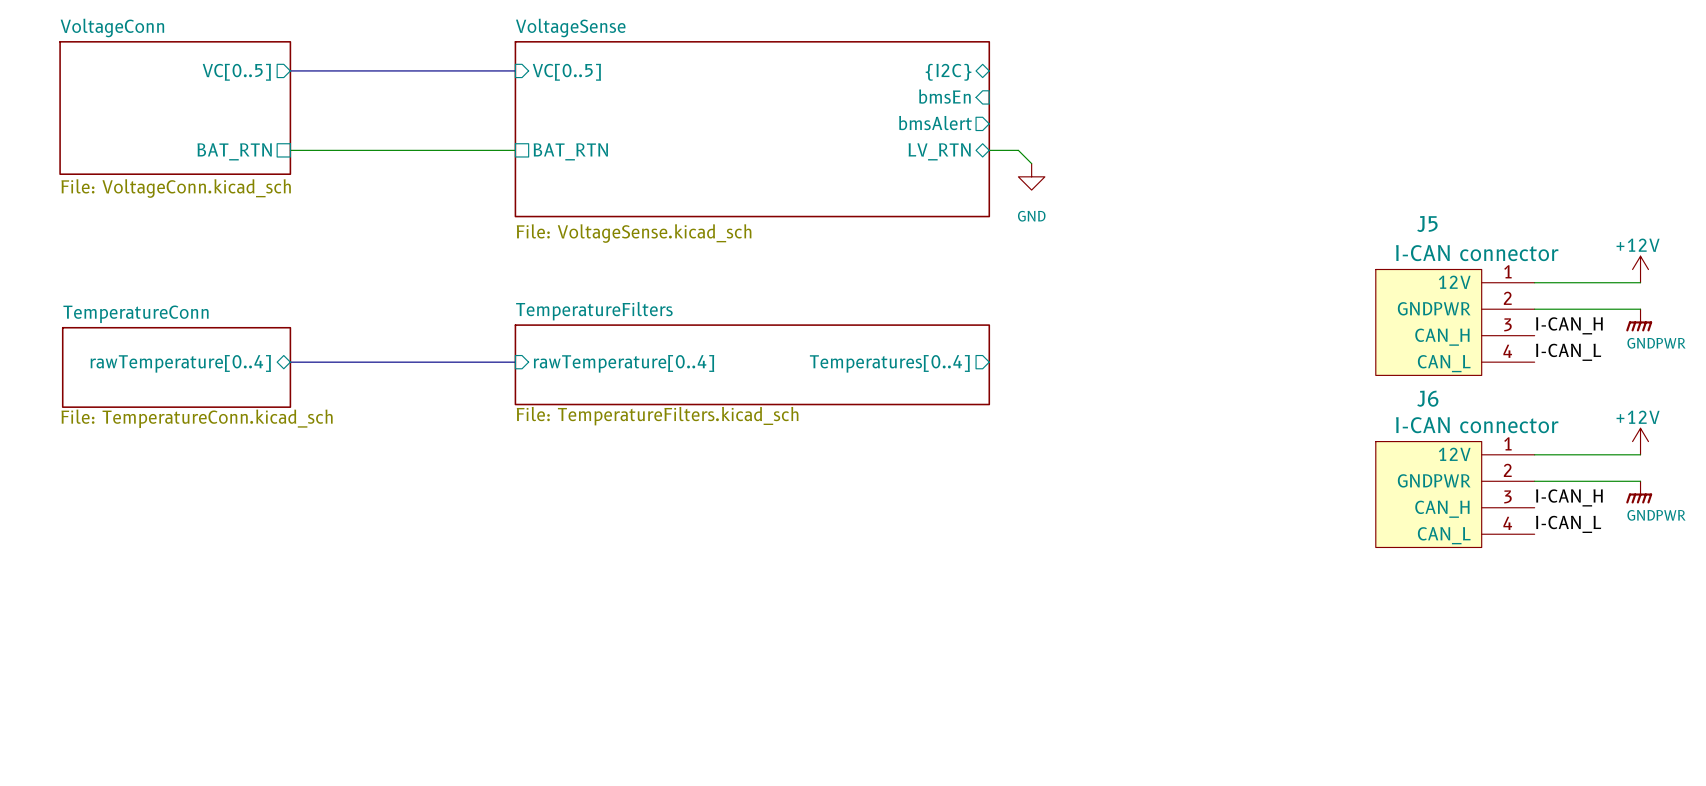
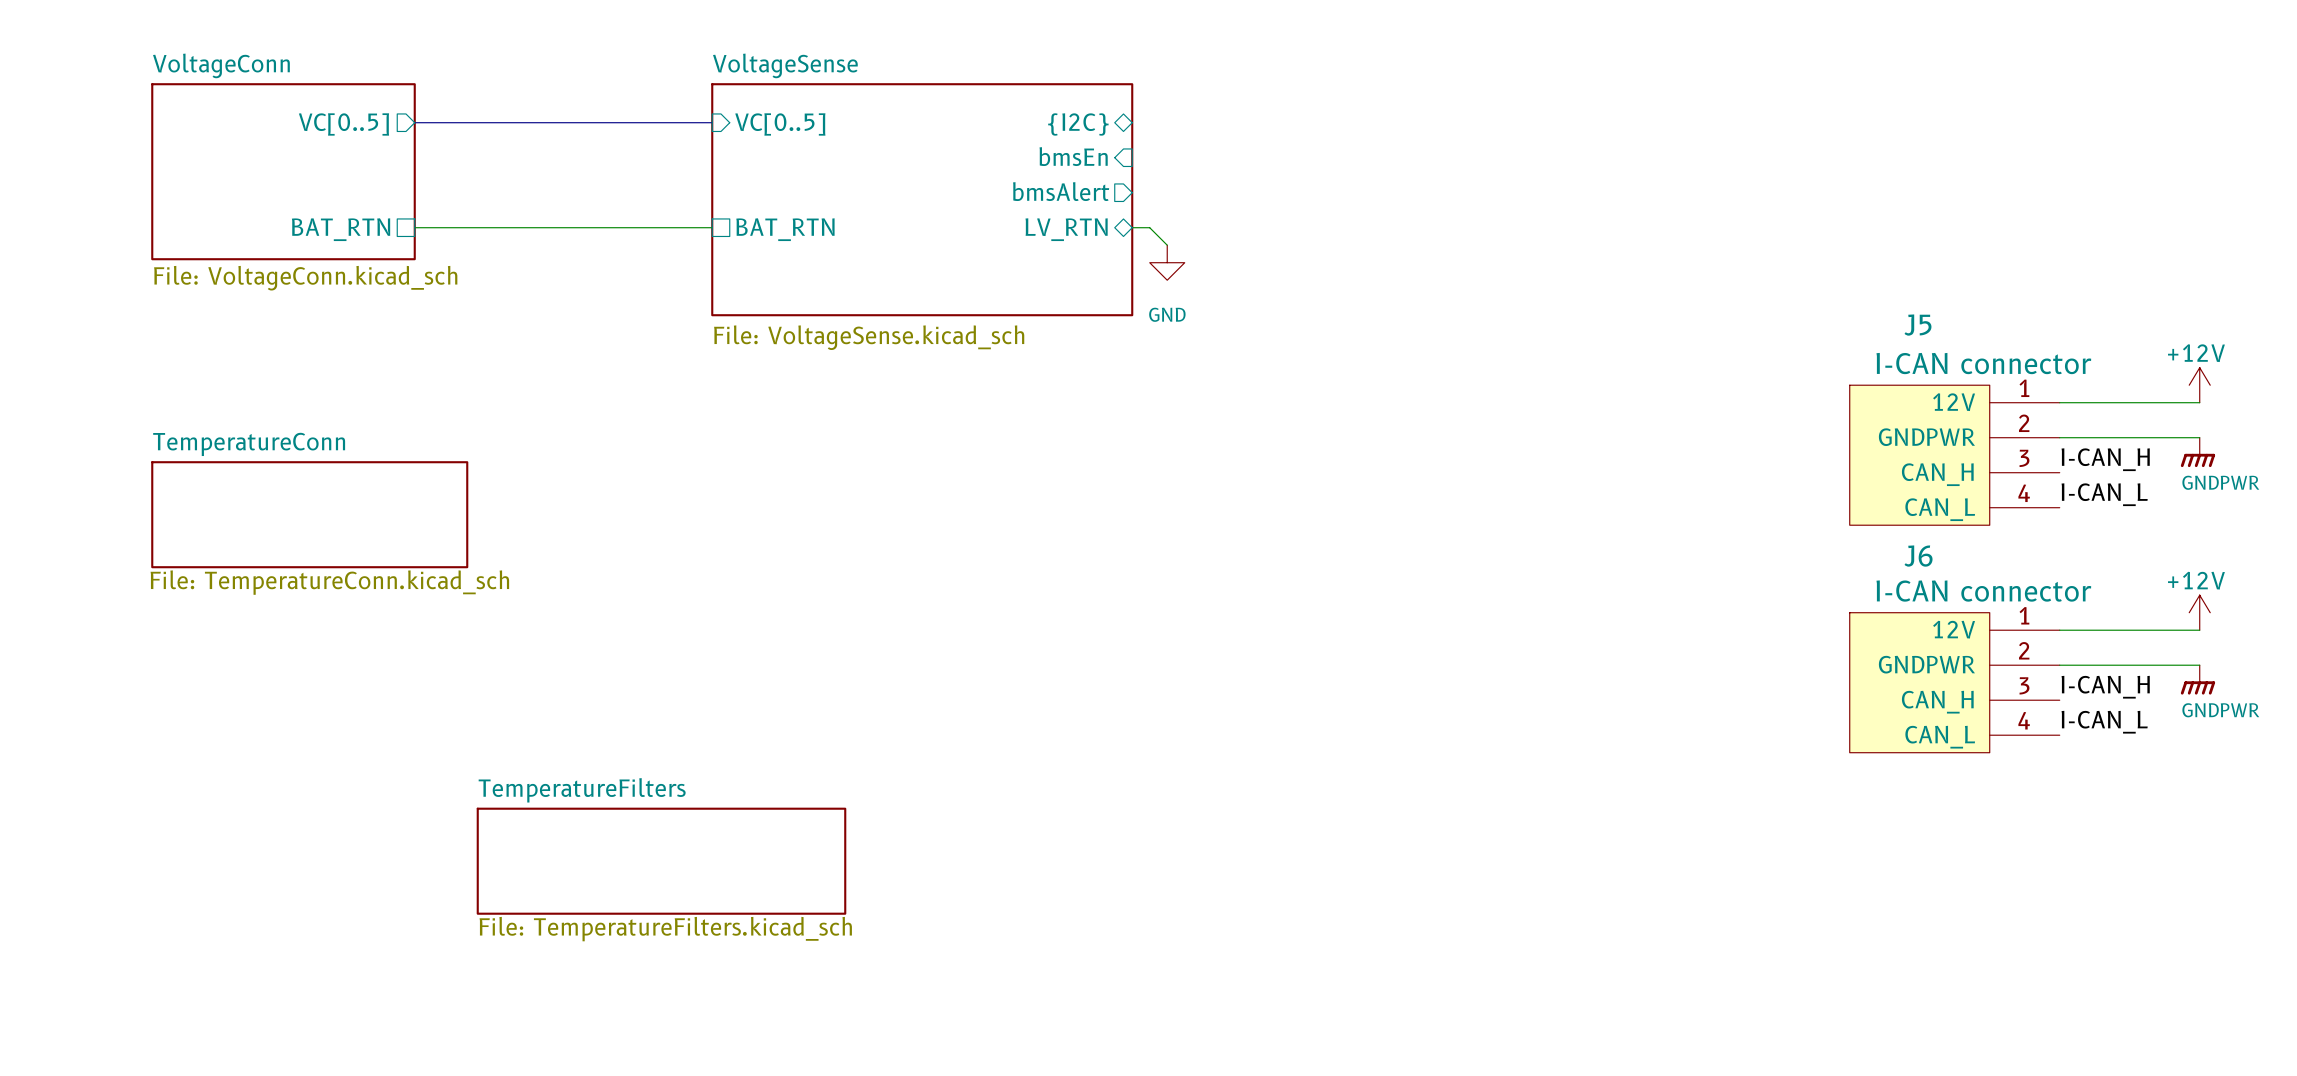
sheet pin position: {I2C} (948, 72) -> {I2C} (1078, 124)
sheet pin position: bmsEn (944, 96) -> bmsEn (1073, 156)
sheet VoltageConn: File: VoltageConn.kicad_sch (175, 108) -> none
sheet VoltageConn: none -> File: VoltageConn.kicad_sch (283, 171)
sheet pin position: bmsAlert (935, 123) -> bmsAlert (1061, 191)
sheet VoltageSense: none -> File: VoltageSense.kicad_sch (922, 199)
sheet VoltageSense: File: VoltageSense.kicad_sch (752, 129) -> none
wire: none -> (1132, 227) (1149, 227) (1167, 245)
wire: (989, 150) (1018, 150) (1031, 163) -> none
sheet pin position: LV_RTN (939, 151) -> LV_RTN (1066, 229)
power symbol position: GND (1031, 176) -> GND (1167, 262)
bus: (290, 362) (515, 362) -> none
sheet pin: rawTemperature[0..4] (180, 363) -> none
sheet pin: rawTemperature[0..4] (624, 363) -> none
sheet pin: Temperatures[0..4] (889, 363) -> none
sheet TemperatureFilters: File: TemperatureFilters.kicad_sch (752, 364) -> none
sheet TemperatureConn: File: TemperatureConn.kicad_sch (176, 367) -> none
sheet TemperatureConn: none -> File: TemperatureConn.kicad_sch (309, 514)
sheet TemperatureFilters: none -> File: TemperatureFilters.kicad_sch (661, 861)

